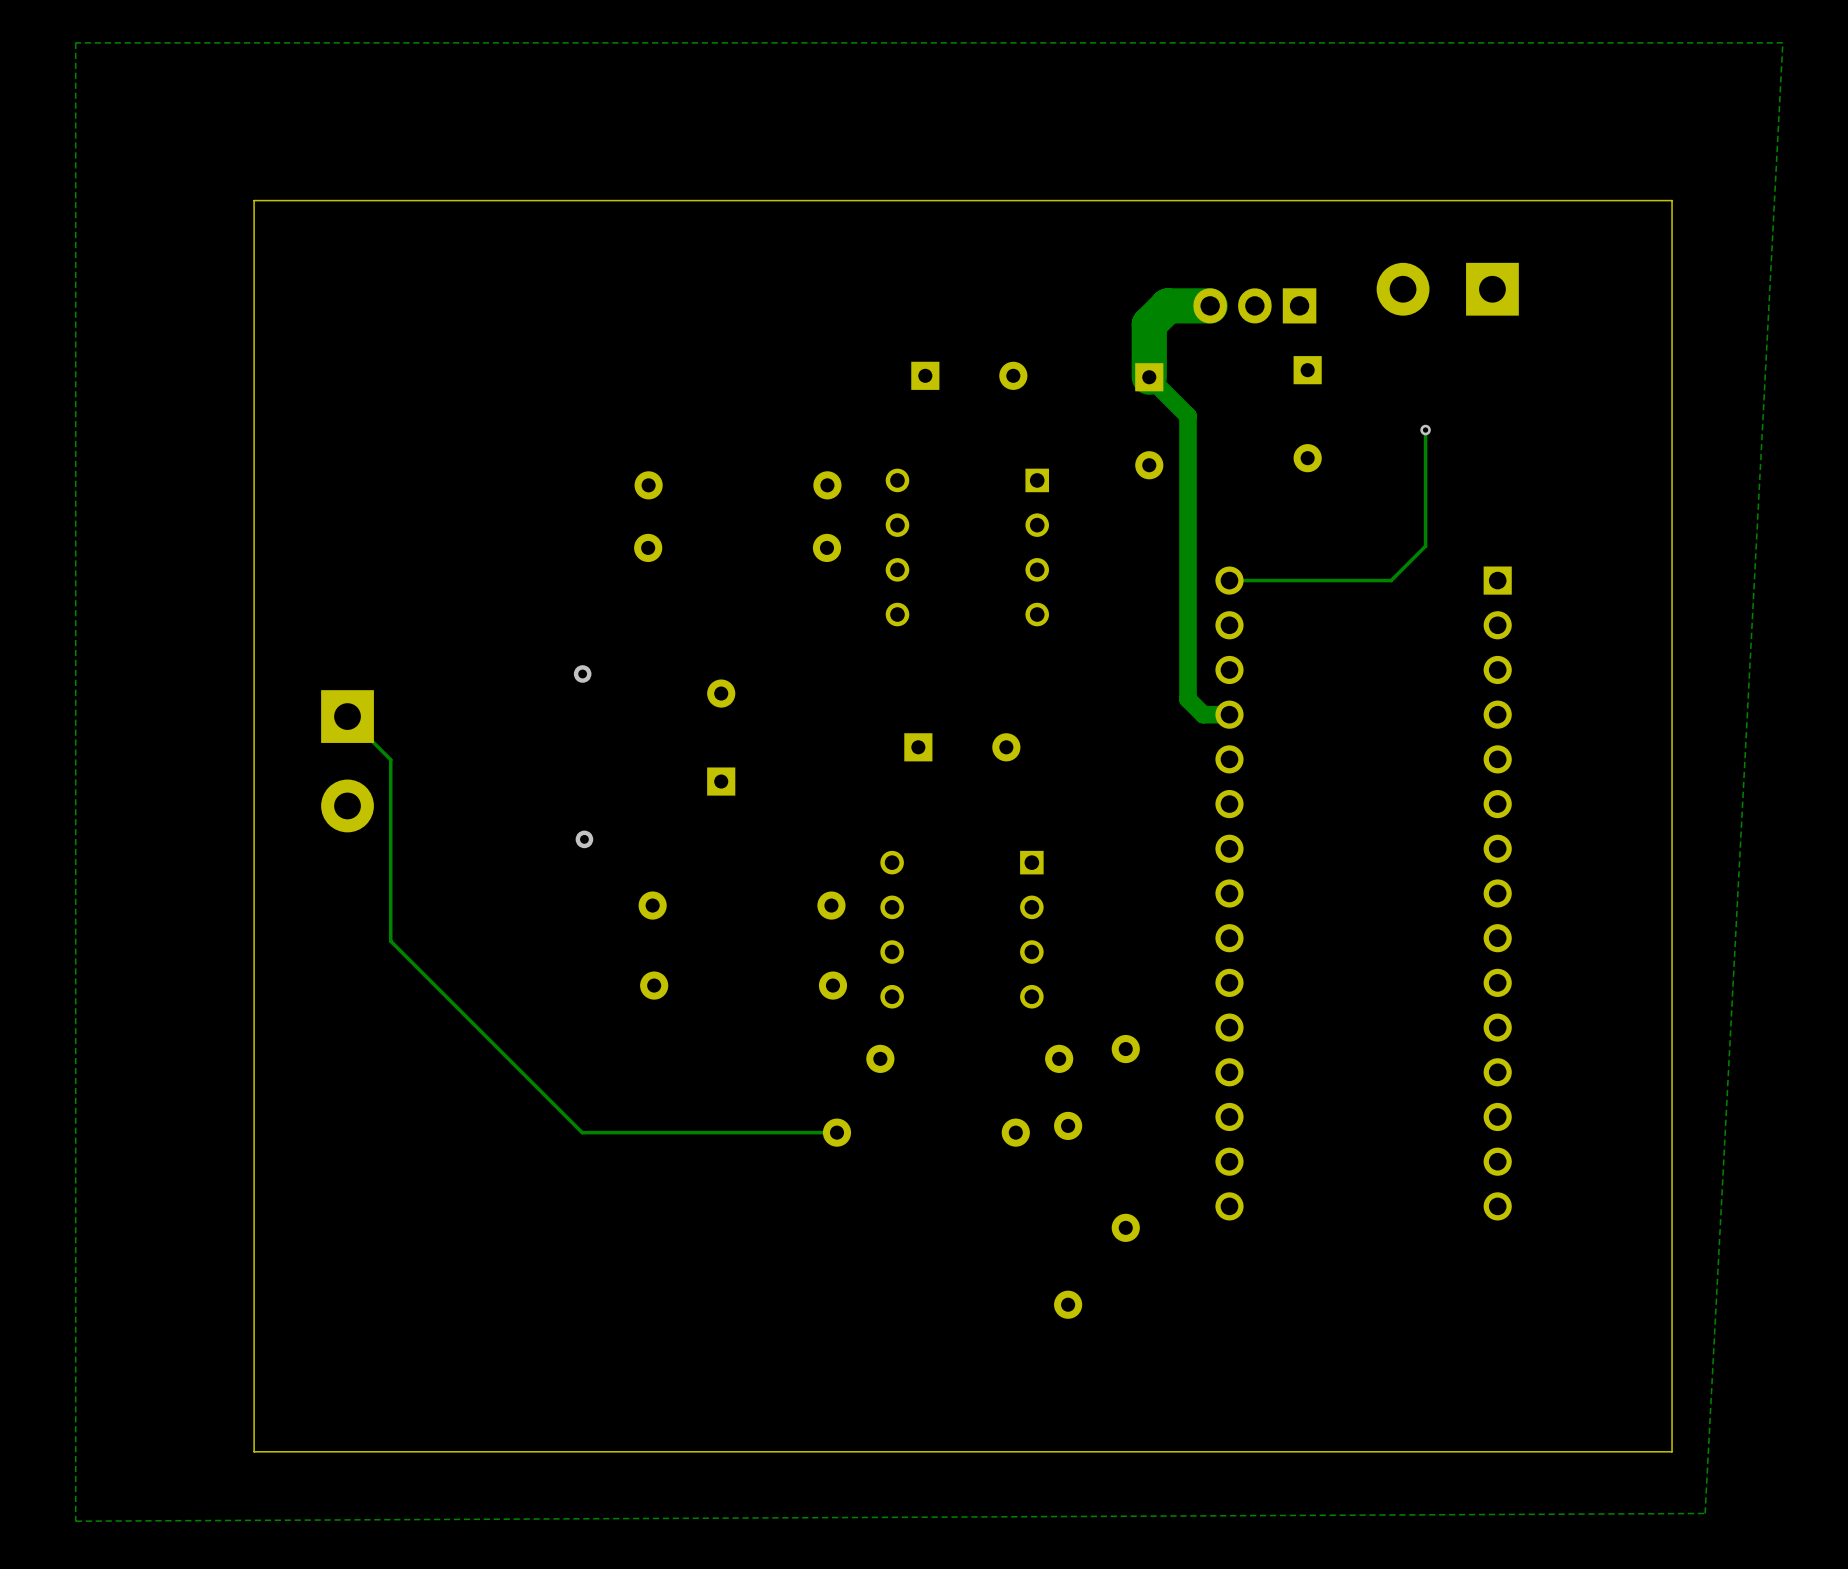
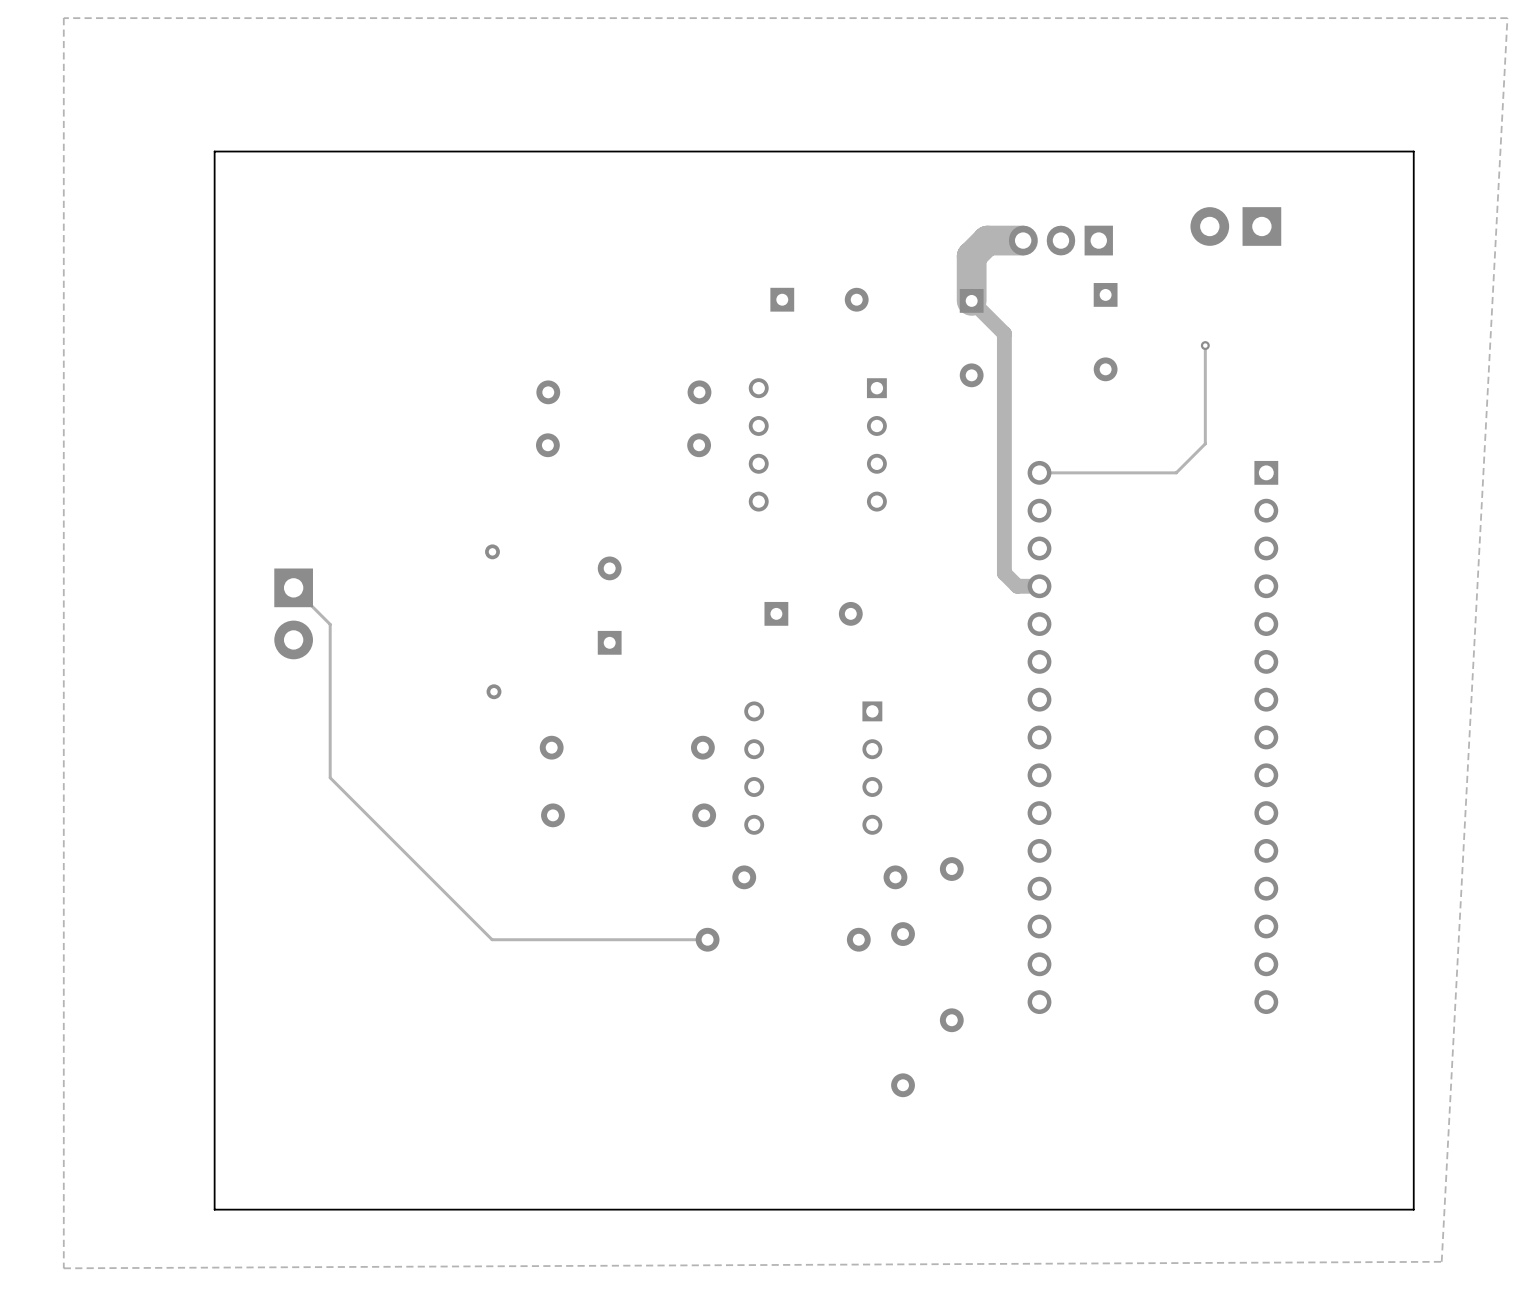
part footprint: [1376, 262, 1519, 316] -> [1190, 207, 1282, 246]
part footprint: [321, 690, 374, 833] -> [274, 568, 313, 660]

